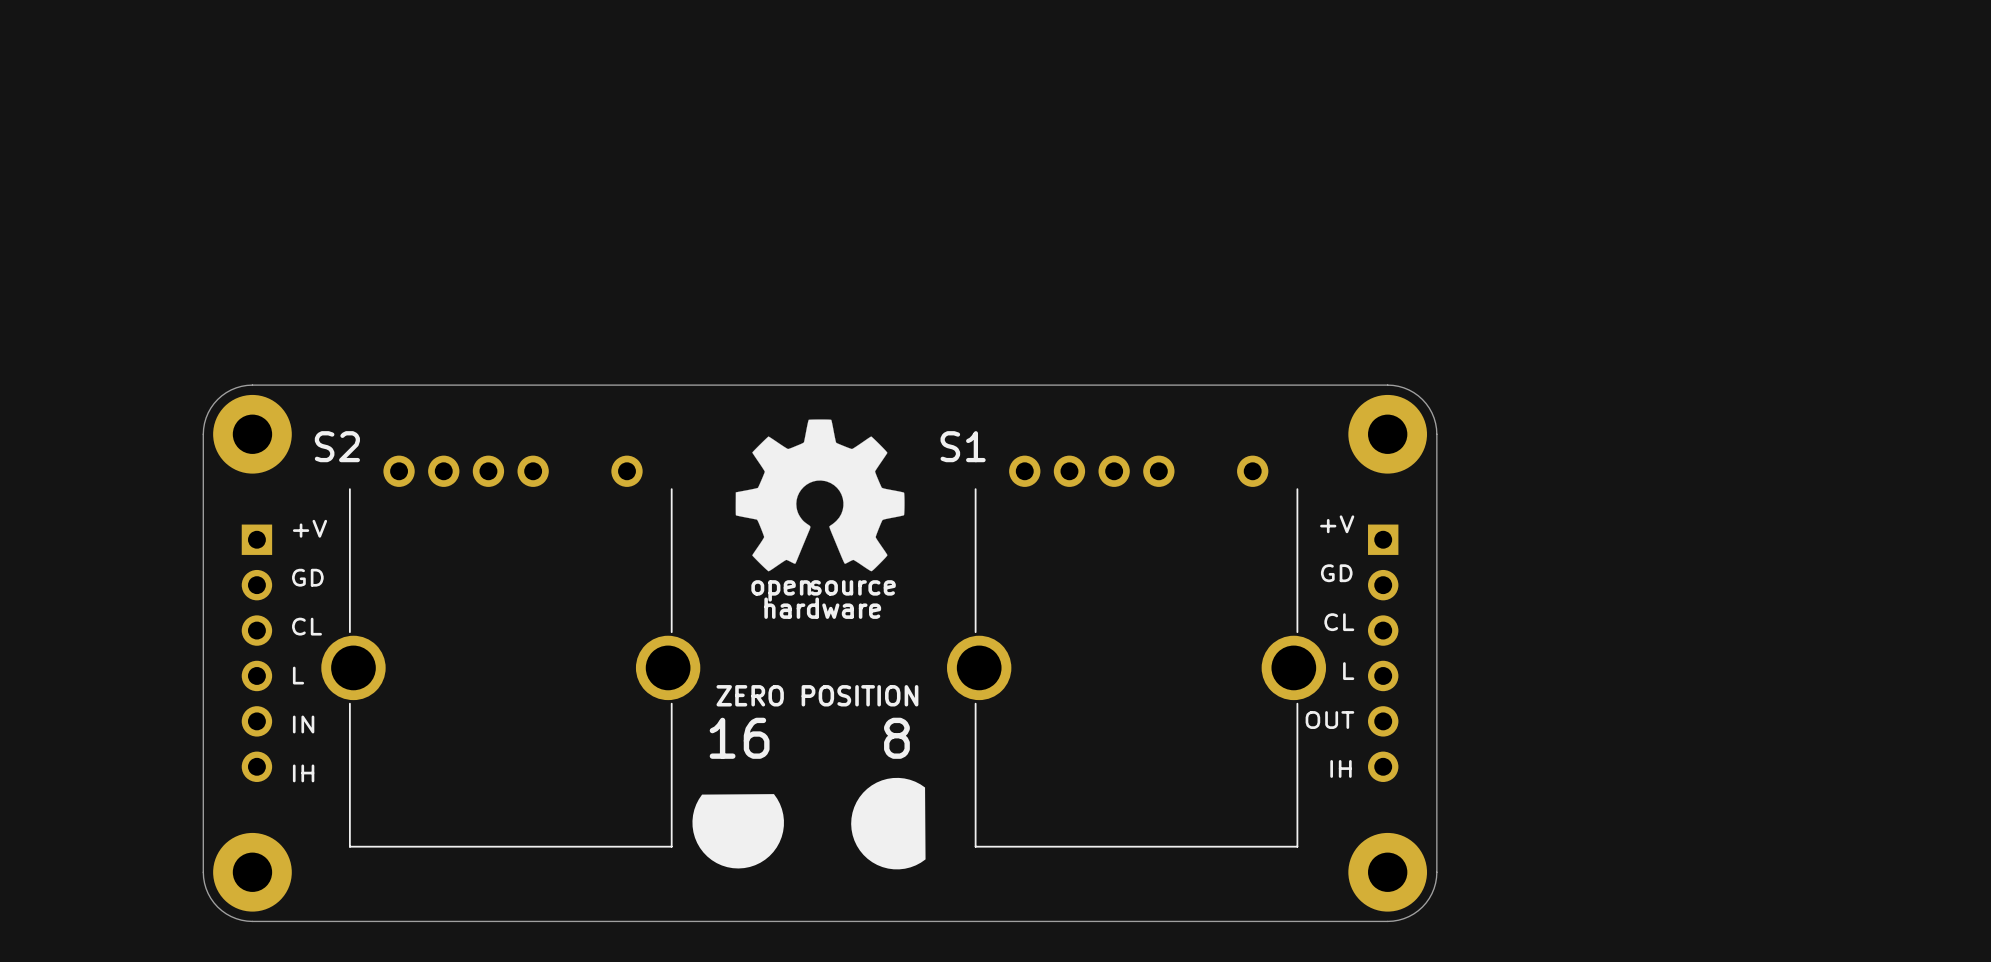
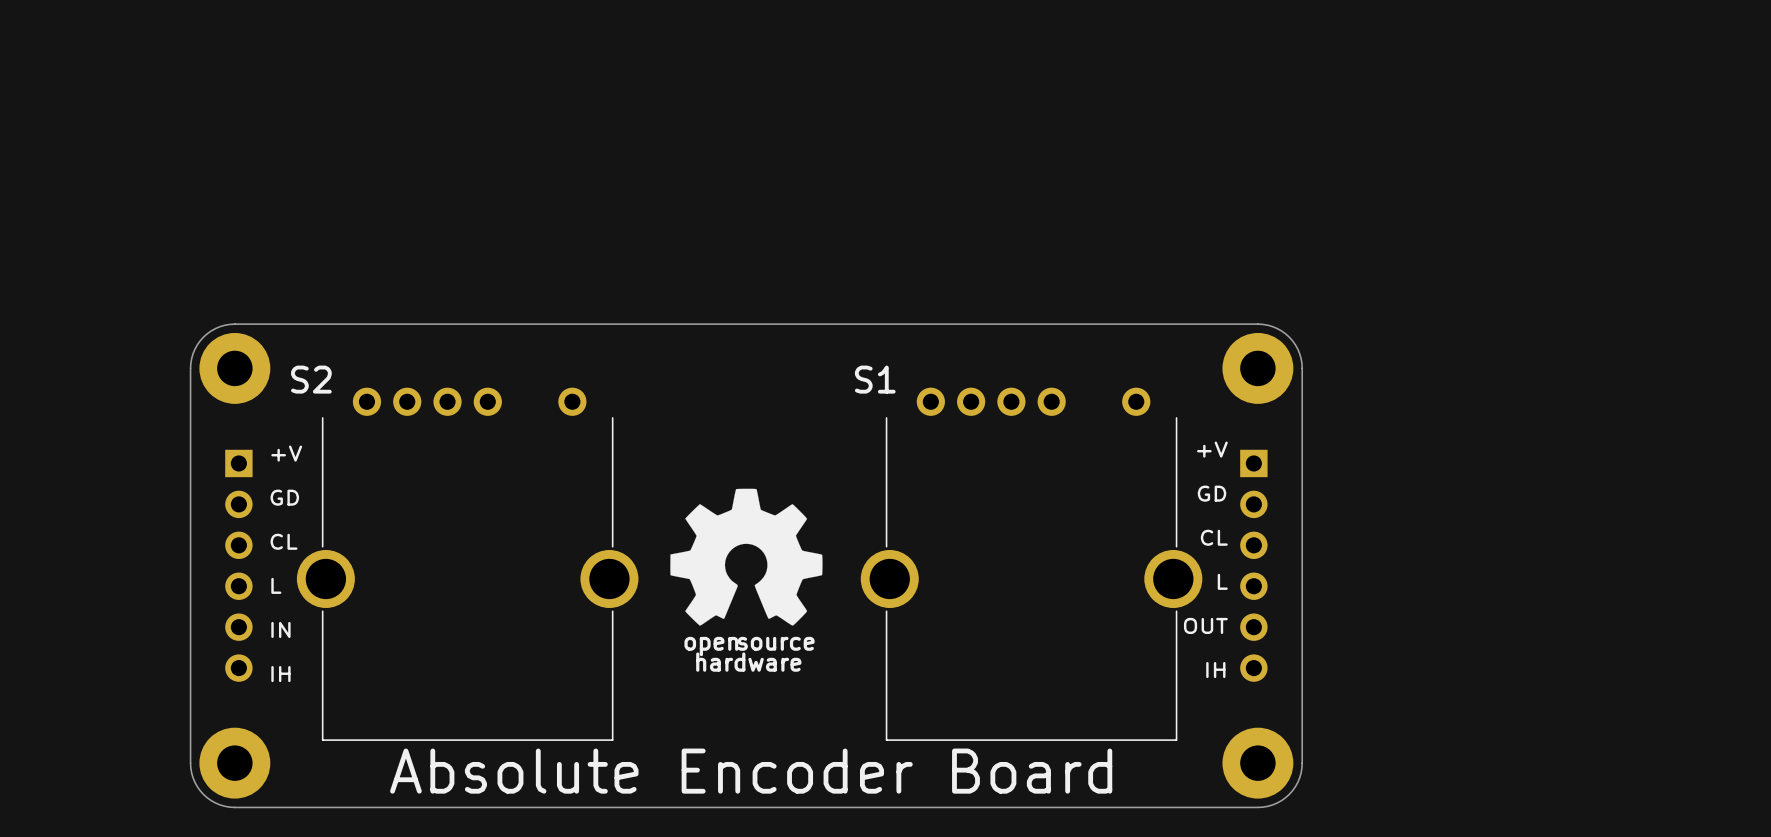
drawing position: (820, 495) -> (746, 557)
text position: source (853, 587) -> source (776, 643)
text position: open (781, 590) -> open (711, 646)
text position: hardware (822, 608) -> hardware (748, 662)
text: ZERO POSITION (817, 695) -> none
text: 16 (739, 738) -> none
text: 8 (896, 738) -> none
drawing: [851, 777, 926, 870] -> none
drawing: [692, 794, 784, 869] -> none
text: none -> Absolute Encoder Board (751, 771)

